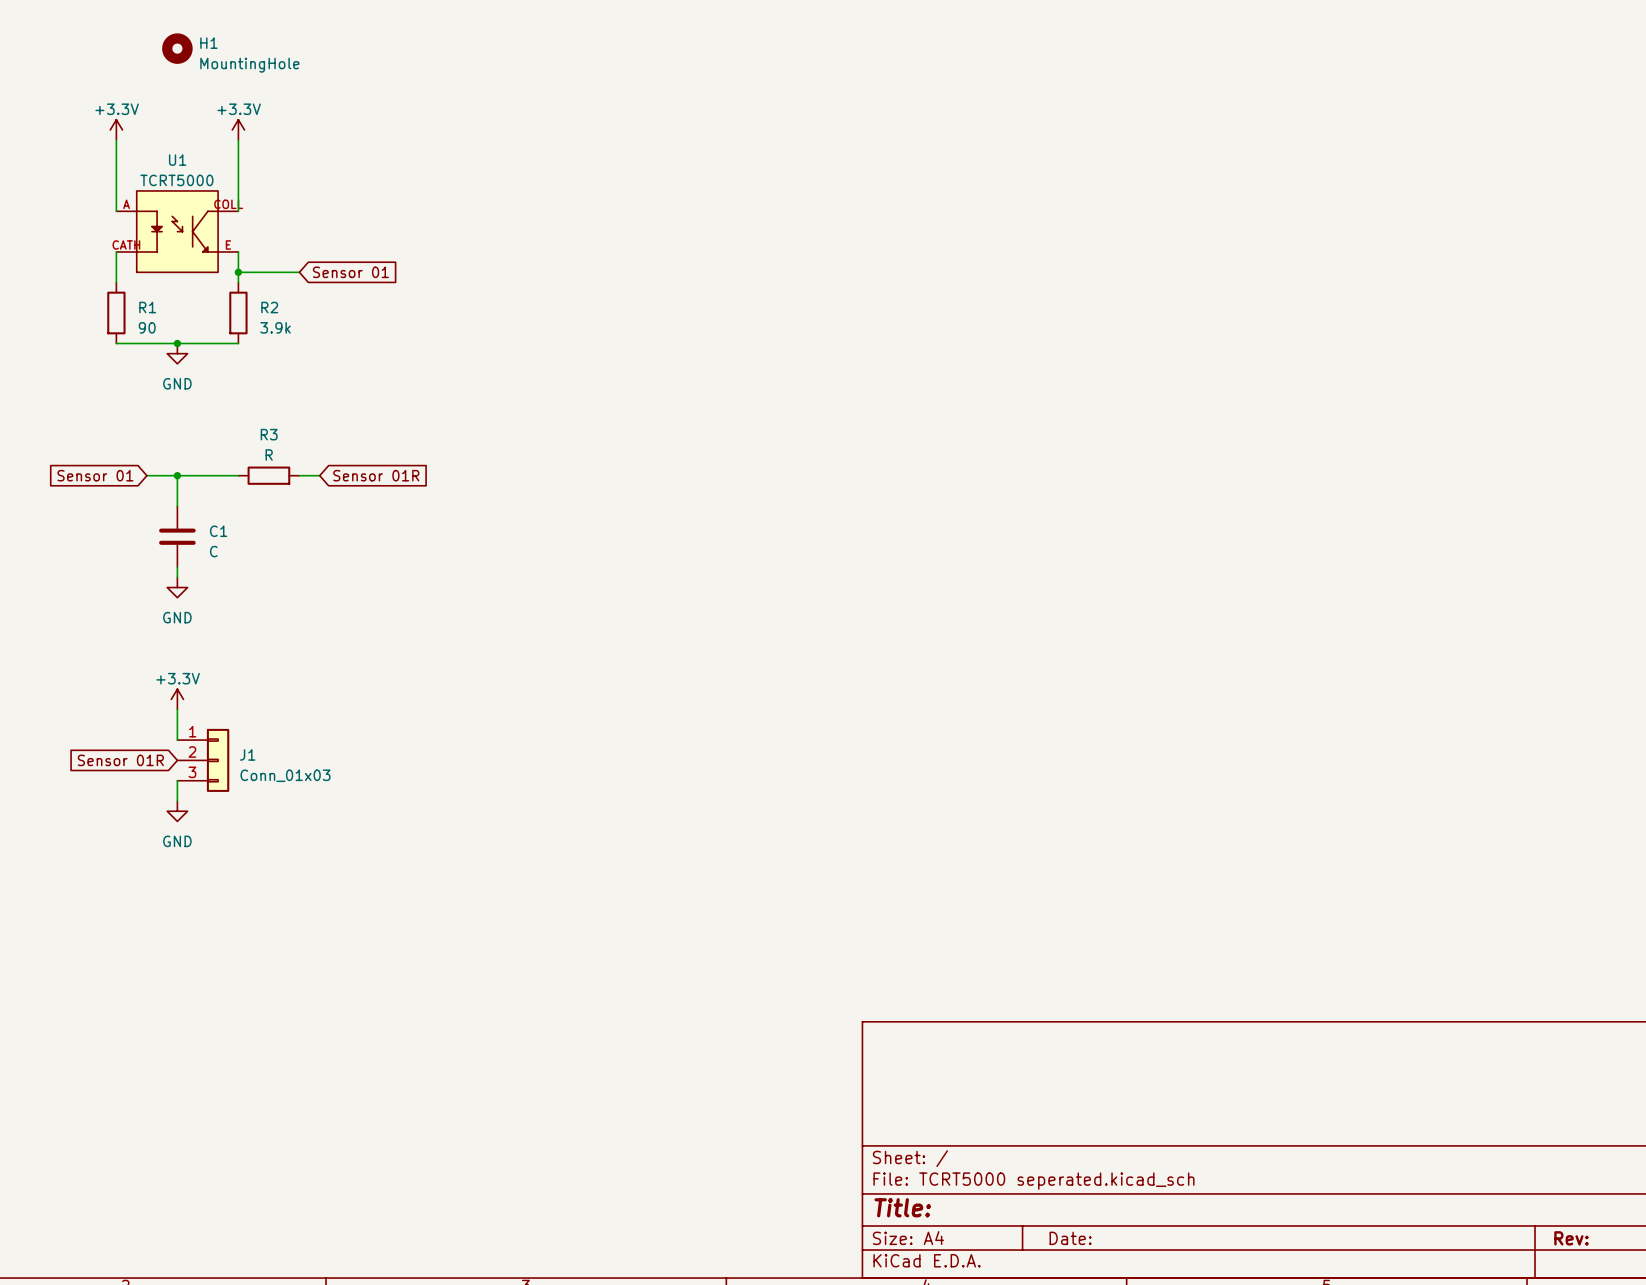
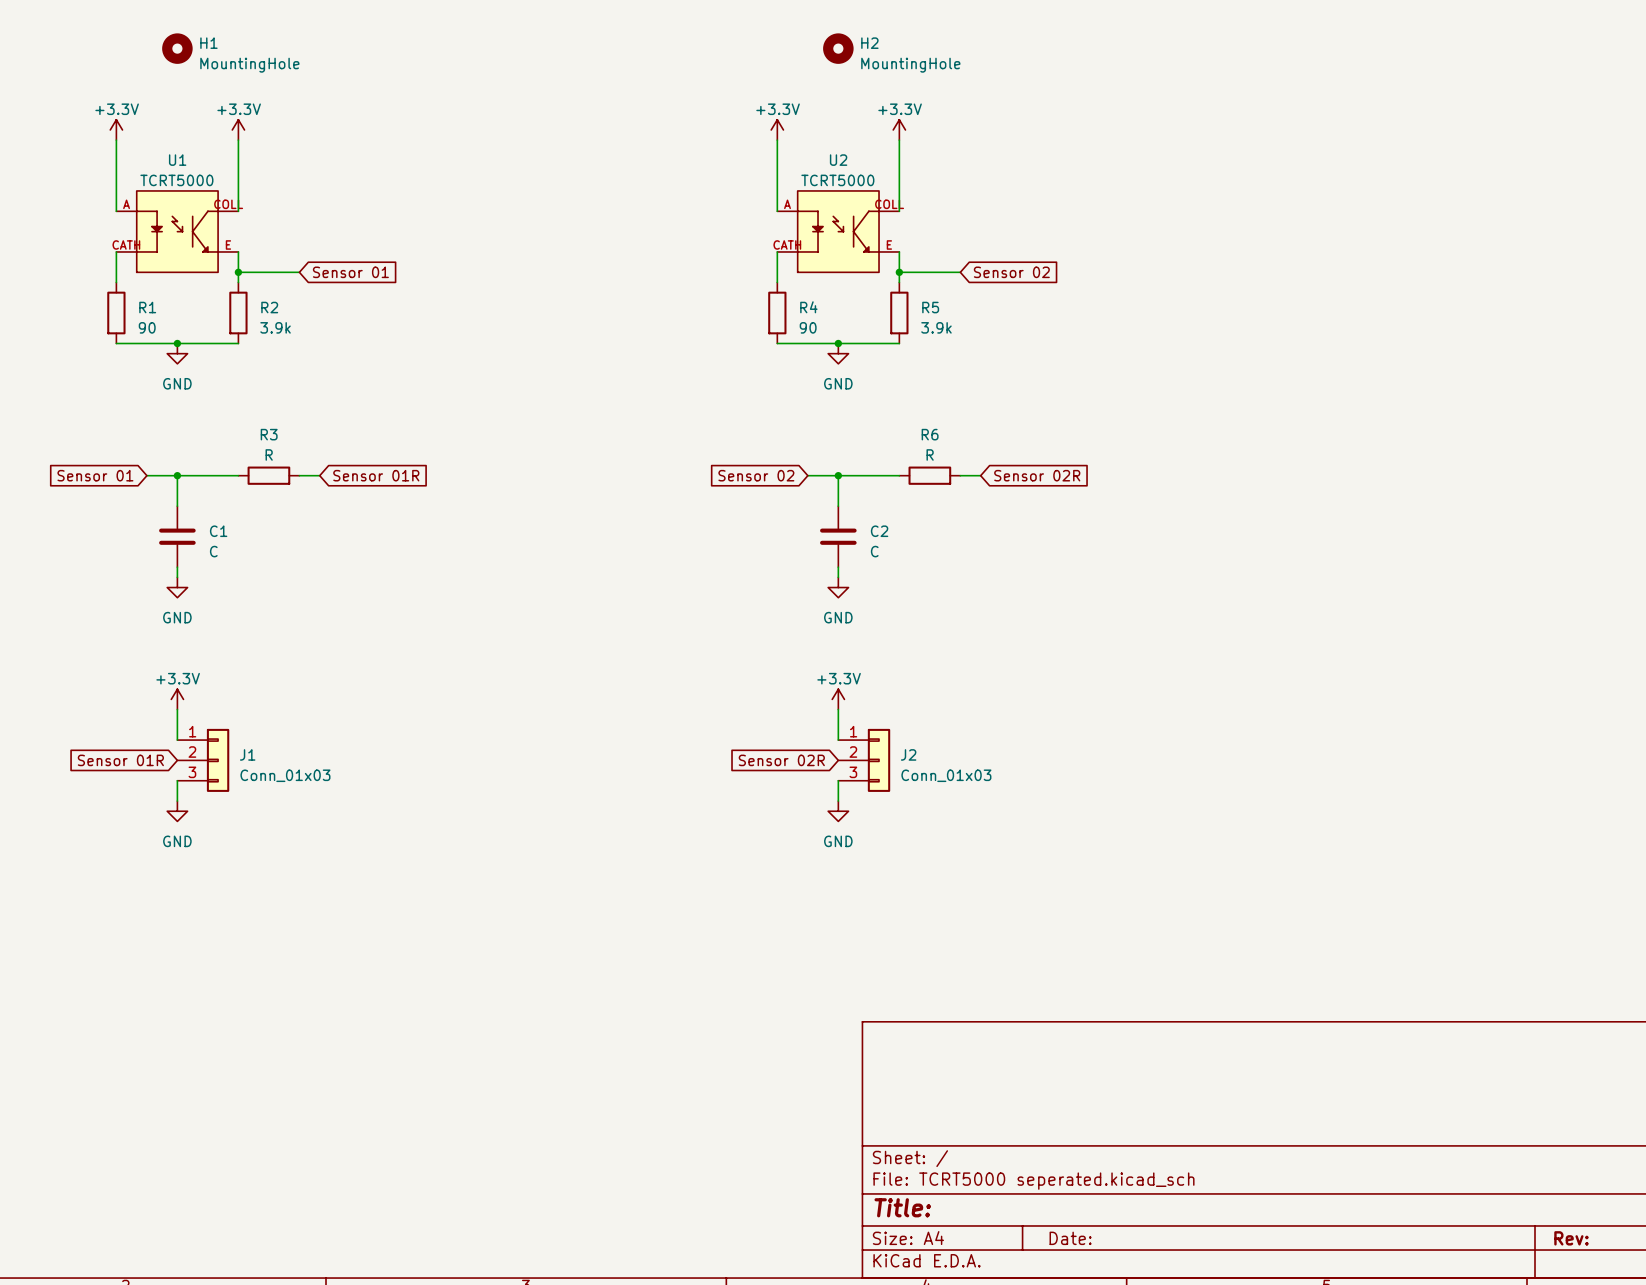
H2: none -> MountingHole (838, 48)
power symbol: none -> +3.3V (777, 129)
power symbol: none -> +3.3V (899, 129)
wire: none -> (777, 140) (777, 211)
wire: none -> (899, 140) (899, 211)
U2: none -> TCRT5000 (838, 231)
wire: none -> (777, 251) (777, 282)
wire: none -> (899, 251) (899, 282)
wire: none -> (899, 272) (960, 272)
junction: none -> (899, 272)
global label: none -> Sensor 02 (1011, 272)
R4: none -> 90 (777, 312)
R5: none -> 3.9k (899, 312)
wire: none -> (777, 343) (899, 343)
junction: none -> (838, 343)
power symbol: none -> GND (838, 353)
global label: none -> Sensor 02 (756, 475)
wire: none -> (807, 475) (899, 475)
wire: none -> (838, 475) (838, 506)
junction: none -> (838, 475)
R6: none -> R (929, 475)
wire: none -> (960, 475) (980, 475)
global label: none -> Sensor 02R (1037, 475)
C2: none -> C (838, 536)
wire: none -> (838, 567) (838, 577)
power symbol: none -> GND (838, 587)
power symbol: none -> +3.3V (838, 699)
wire: none -> (838, 709) (838, 740)
global label: none -> Sensor 02R (781, 760)
J2: none -> Conn_01x03 (864, 760)
wire: none -> (838, 780) (838, 801)
power symbol: none -> GND (838, 811)

